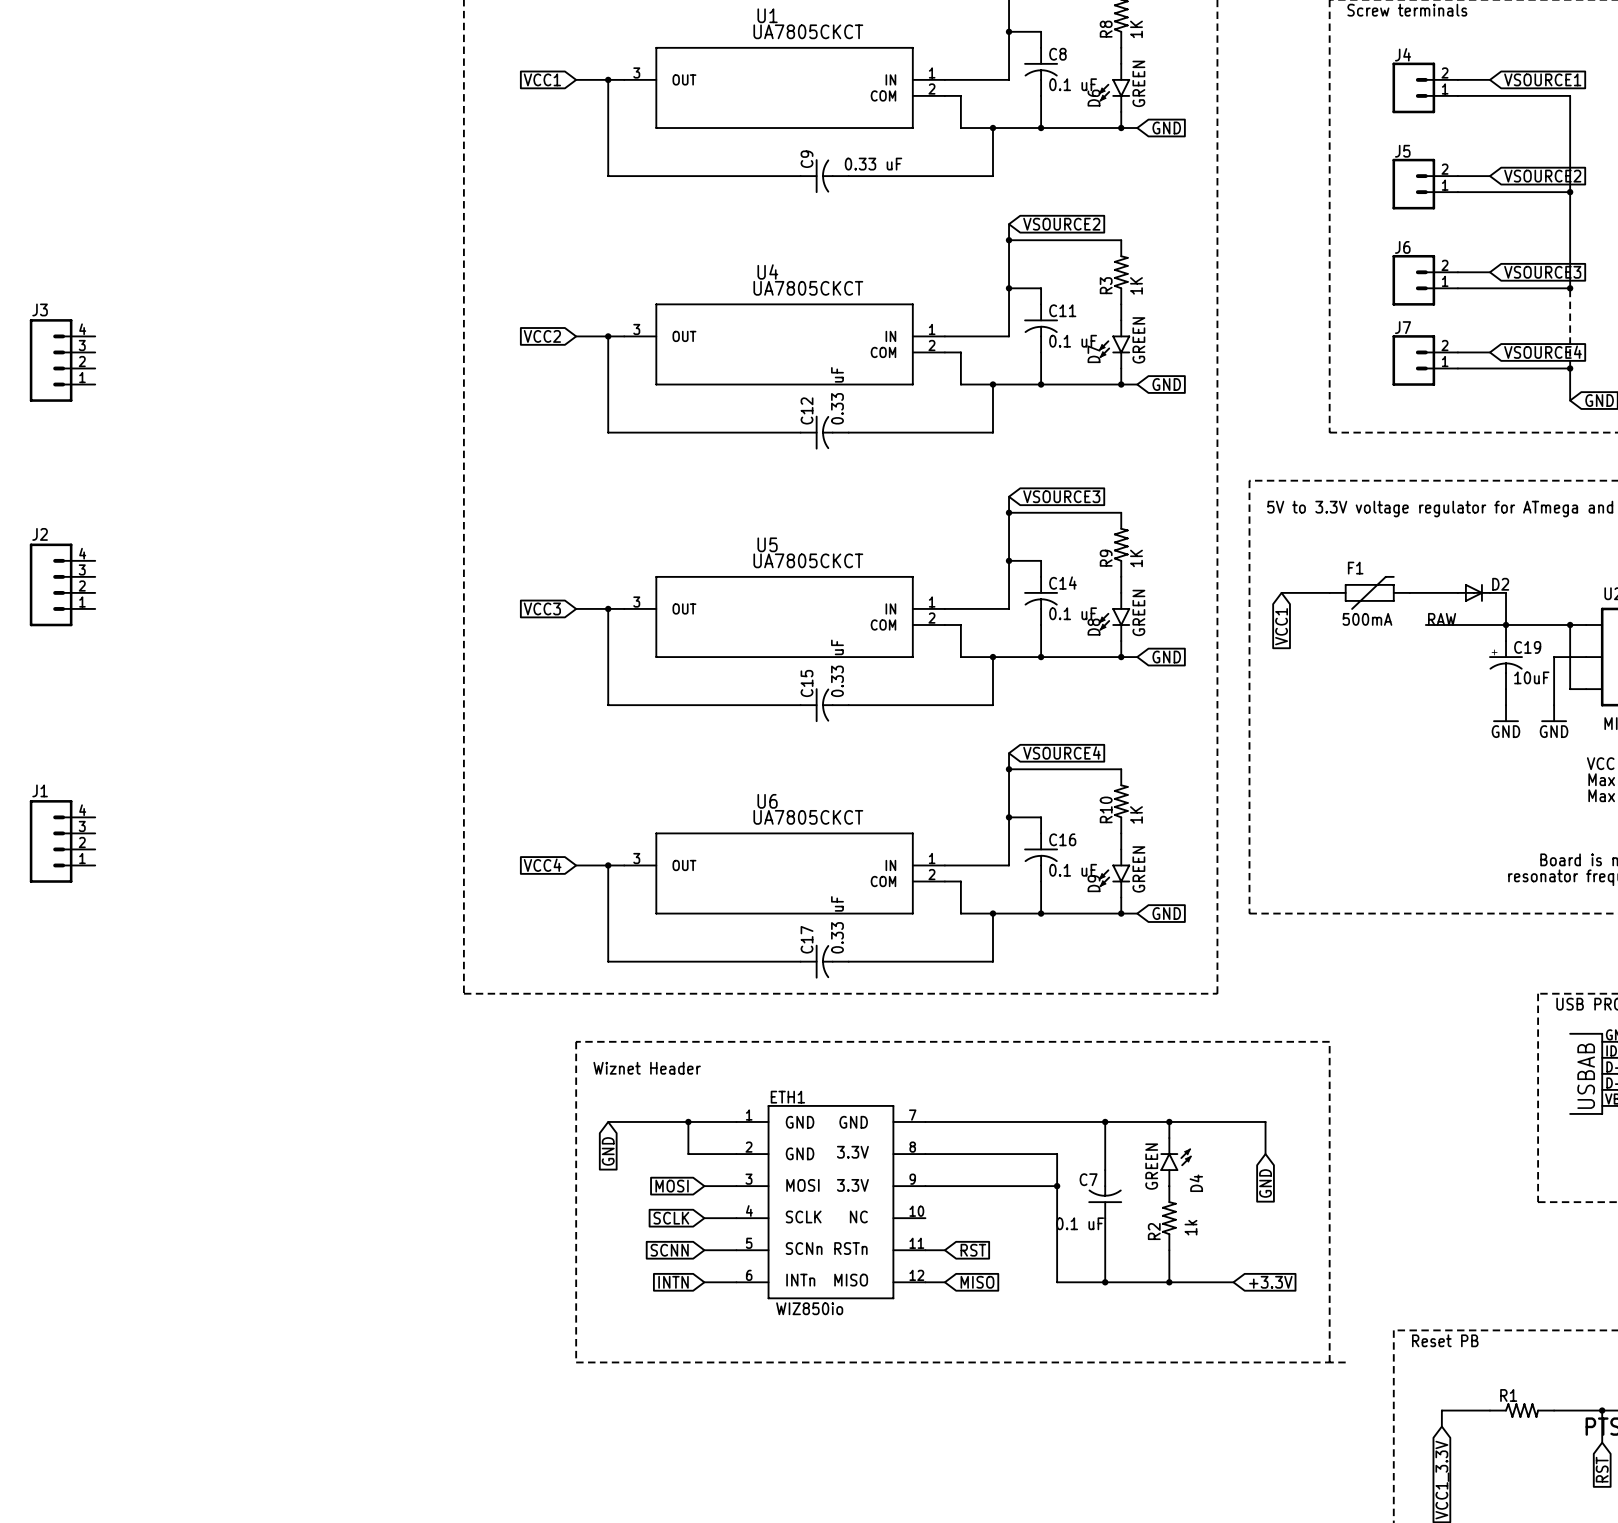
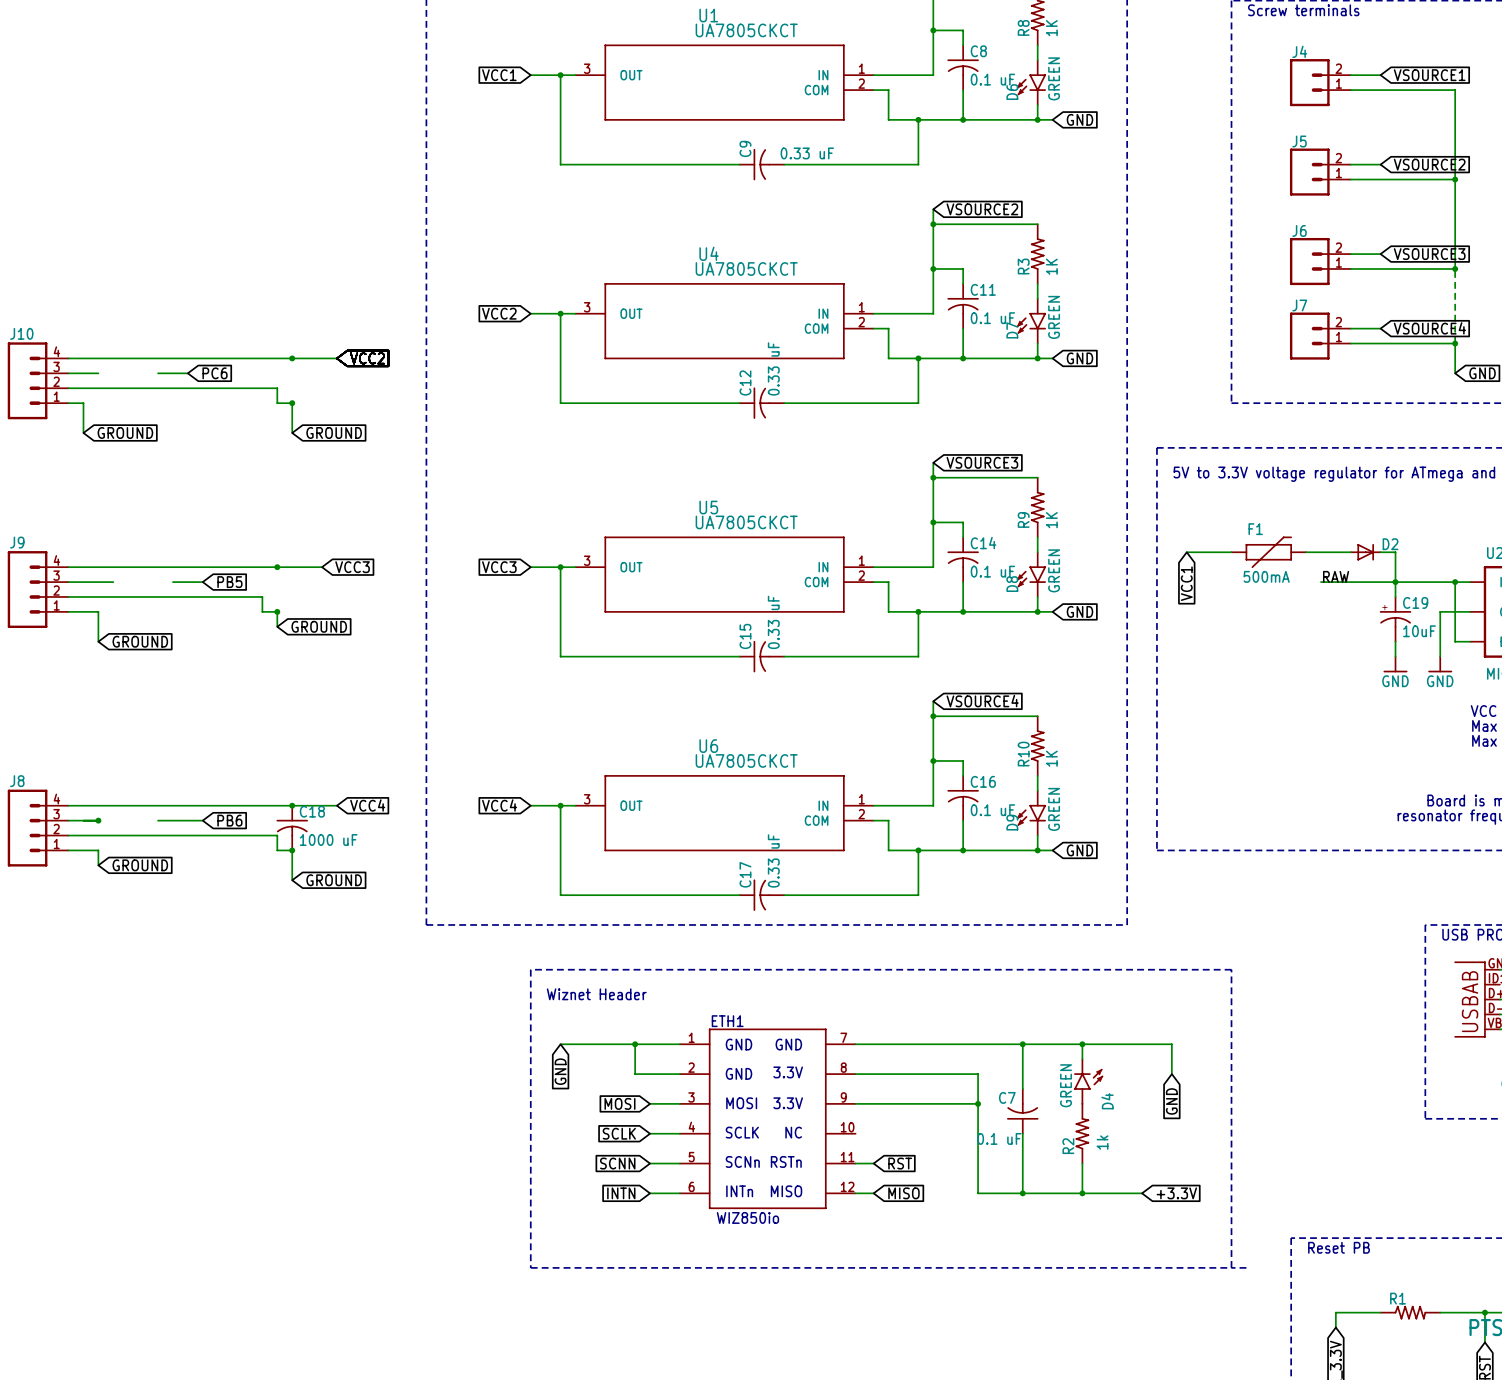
J3: (62, 360) -> none
wire: none -> (68, 358) (336, 358)
junction: none -> (292, 358)
global label: none -> VCC2 (367, 358)
wire: none -> (68, 373) (98, 373)
wire: none -> (158, 373) (187, 373)
global label: none -> PC6 (215, 373)
J10: none -> (38, 380)
wire: none -> (68, 388) (277, 388) (277, 403) (292, 403) (292, 432)
wire: none -> (68, 403) (83, 403) (83, 432)
junction: none -> (292, 403)
global label: none -> GROUND (125, 432)
global label: none -> GROUND (334, 432)
J2: (62, 584) -> none
wire: none -> (68, 567) (322, 567)
junction: none -> (277, 567)
global label: none -> VCC3 (352, 567)
wire: none -> (68, 582) (113, 582)
wire: none -> (172, 582) (202, 582)
global label: none -> PB5 (229, 582)
J9: none -> (38, 589)
wire: none -> (68, 596) (262, 596) (262, 611) (277, 611) (277, 626)
wire: none -> (68, 611) (98, 611) (98, 641)
junction: none -> (277, 611)
global label: none -> GROUND (319, 626)
global label: none -> GROUND (140, 641)
J1: (62, 841) -> none
wire: none -> (68, 805) (336, 805)
junction: none -> (292, 805)
global label: none -> VCC4 (367, 805)
wire: none -> (68, 820) (98, 820)
junction: none -> (98, 820)
wire: none -> (158, 820) (202, 820)
global label: none -> PB6 (229, 820)
J8: none -> (38, 828)
C18: none -> 1000 uF (292, 828)
wire: none -> (68, 835) (277, 835) (277, 850) (292, 850) (292, 880)
wire: none -> (68, 850) (98, 850) (98, 865)
junction: none -> (292, 850)
global label: none -> GROUND (140, 865)
global label: none -> GROUND (334, 880)

